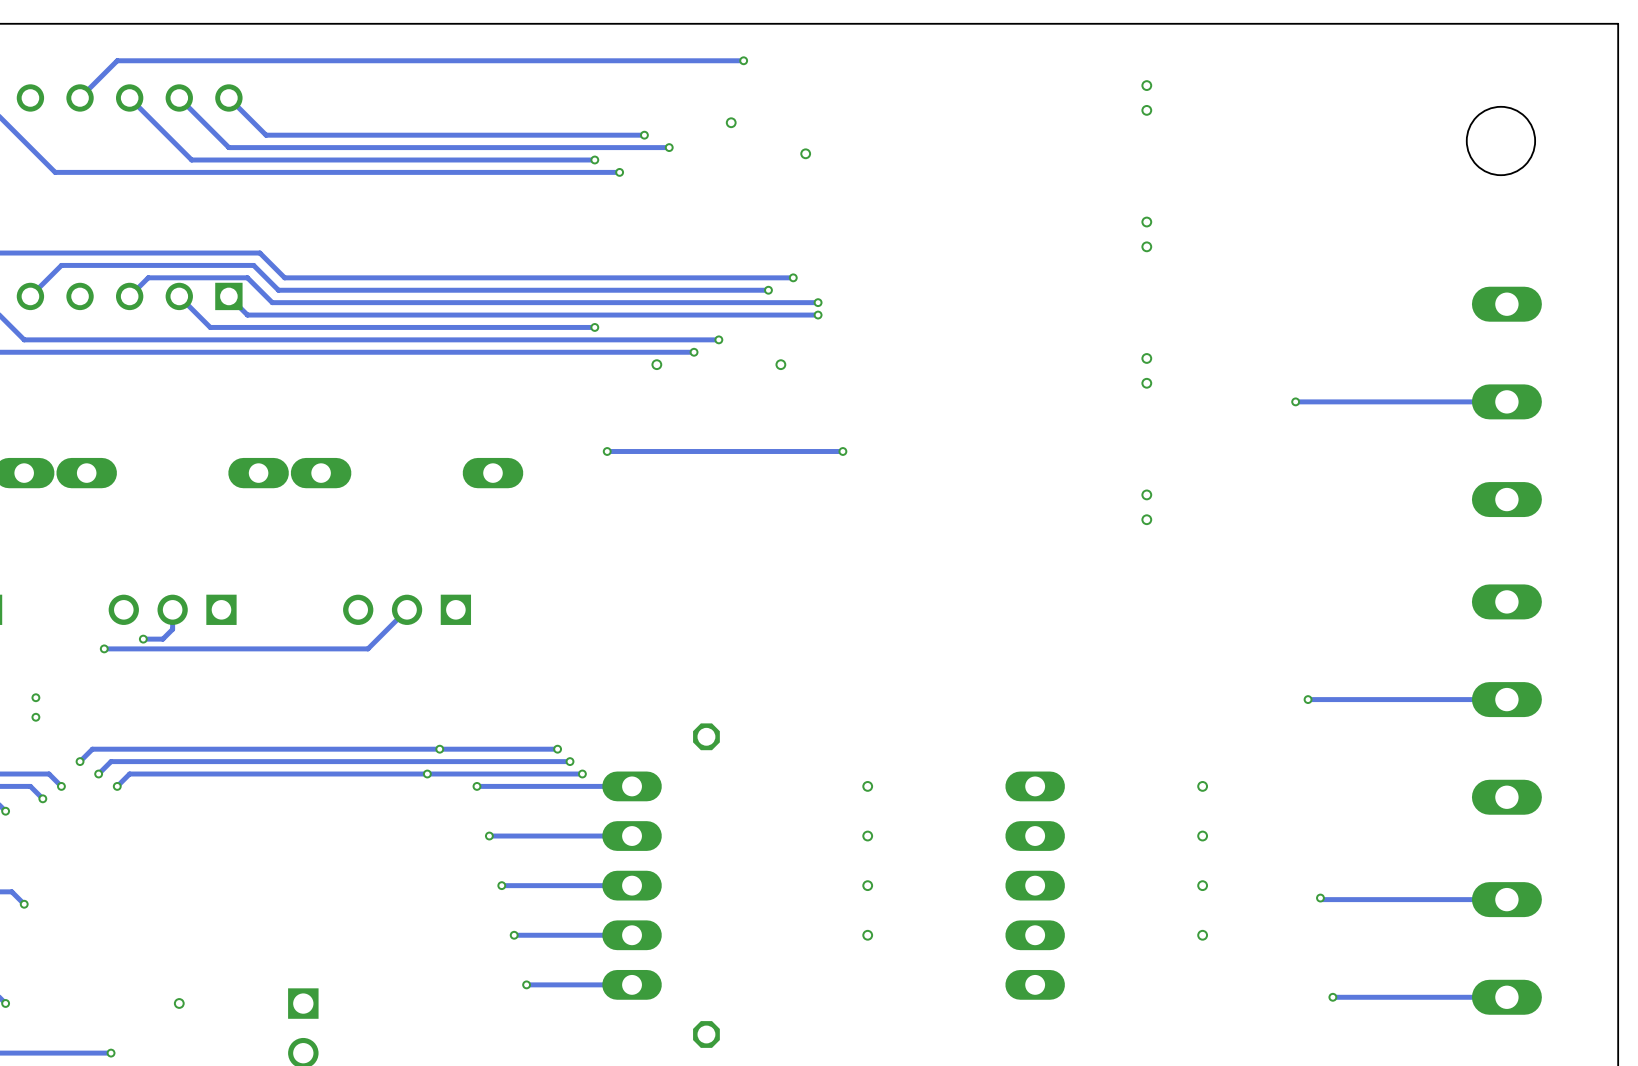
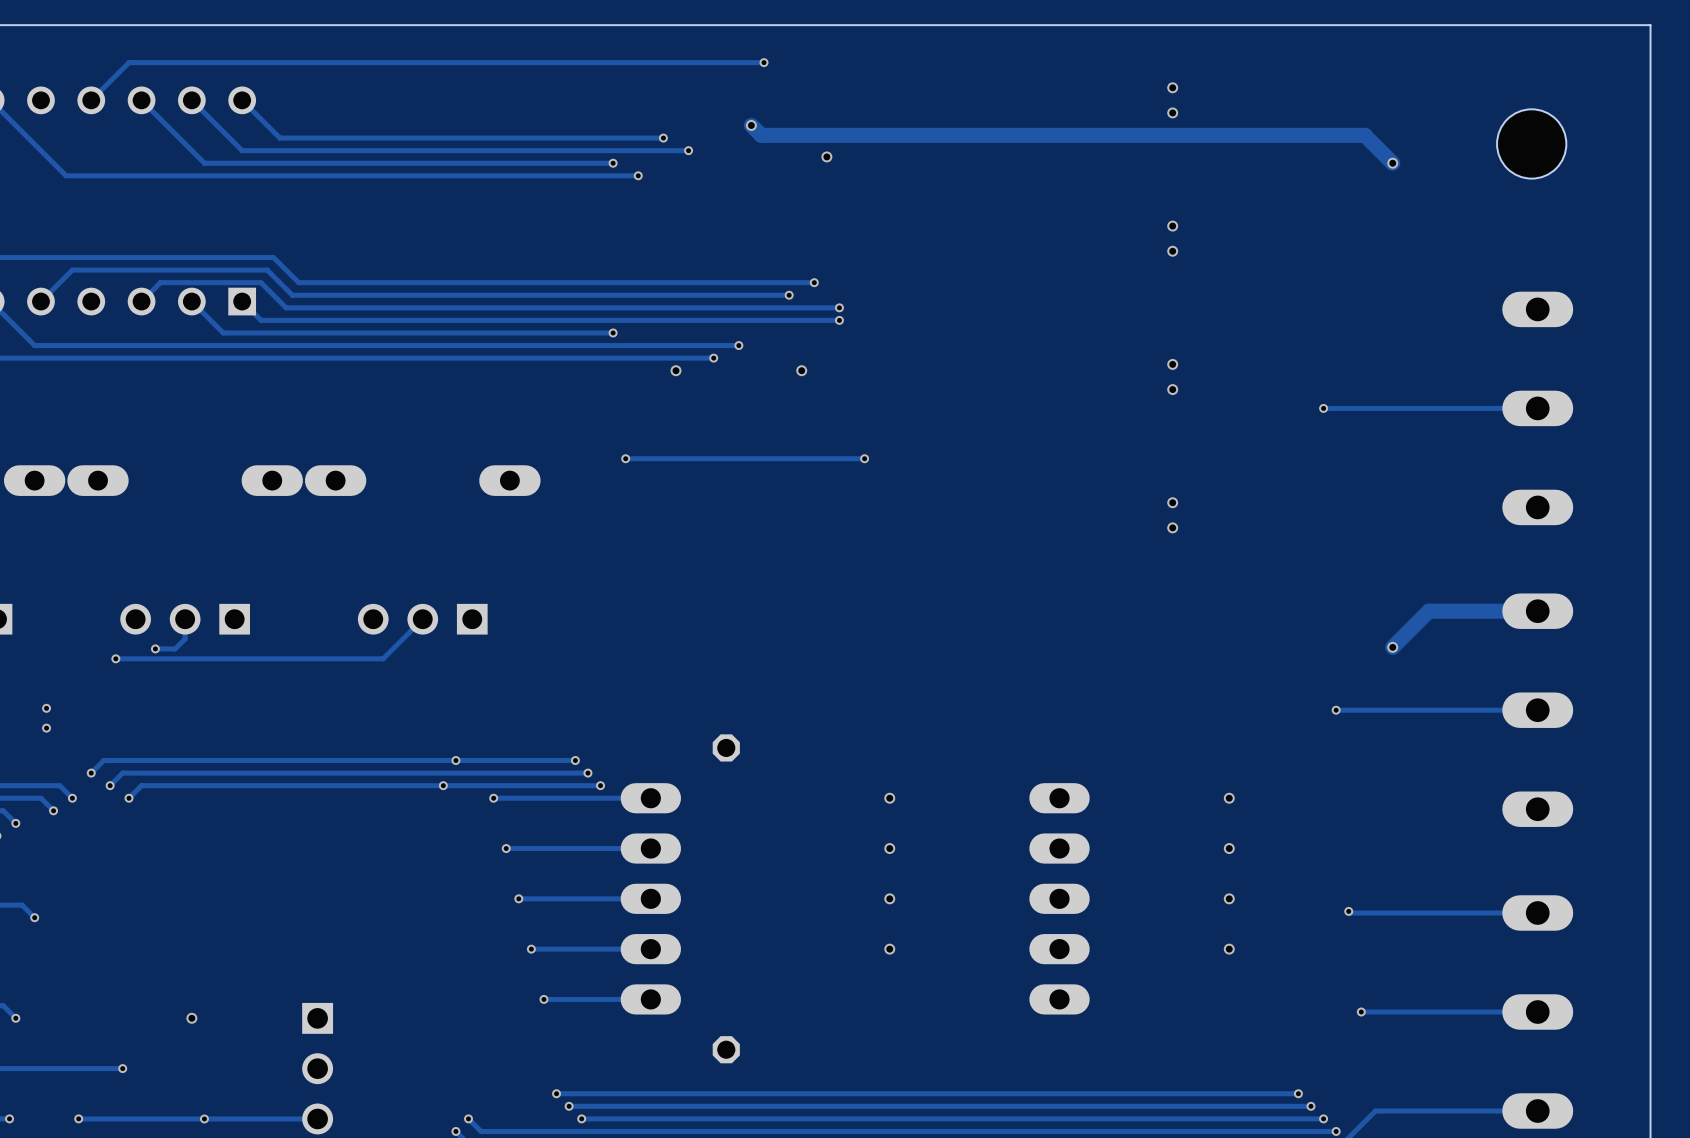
track: none -> (751, 125) (761, 135) (1364, 135) (1392, 163)
via: none -> (1392, 163)
track: none -> (1537, 611) (1428, 611) (1392, 647)
via: none -> (1392, 647)

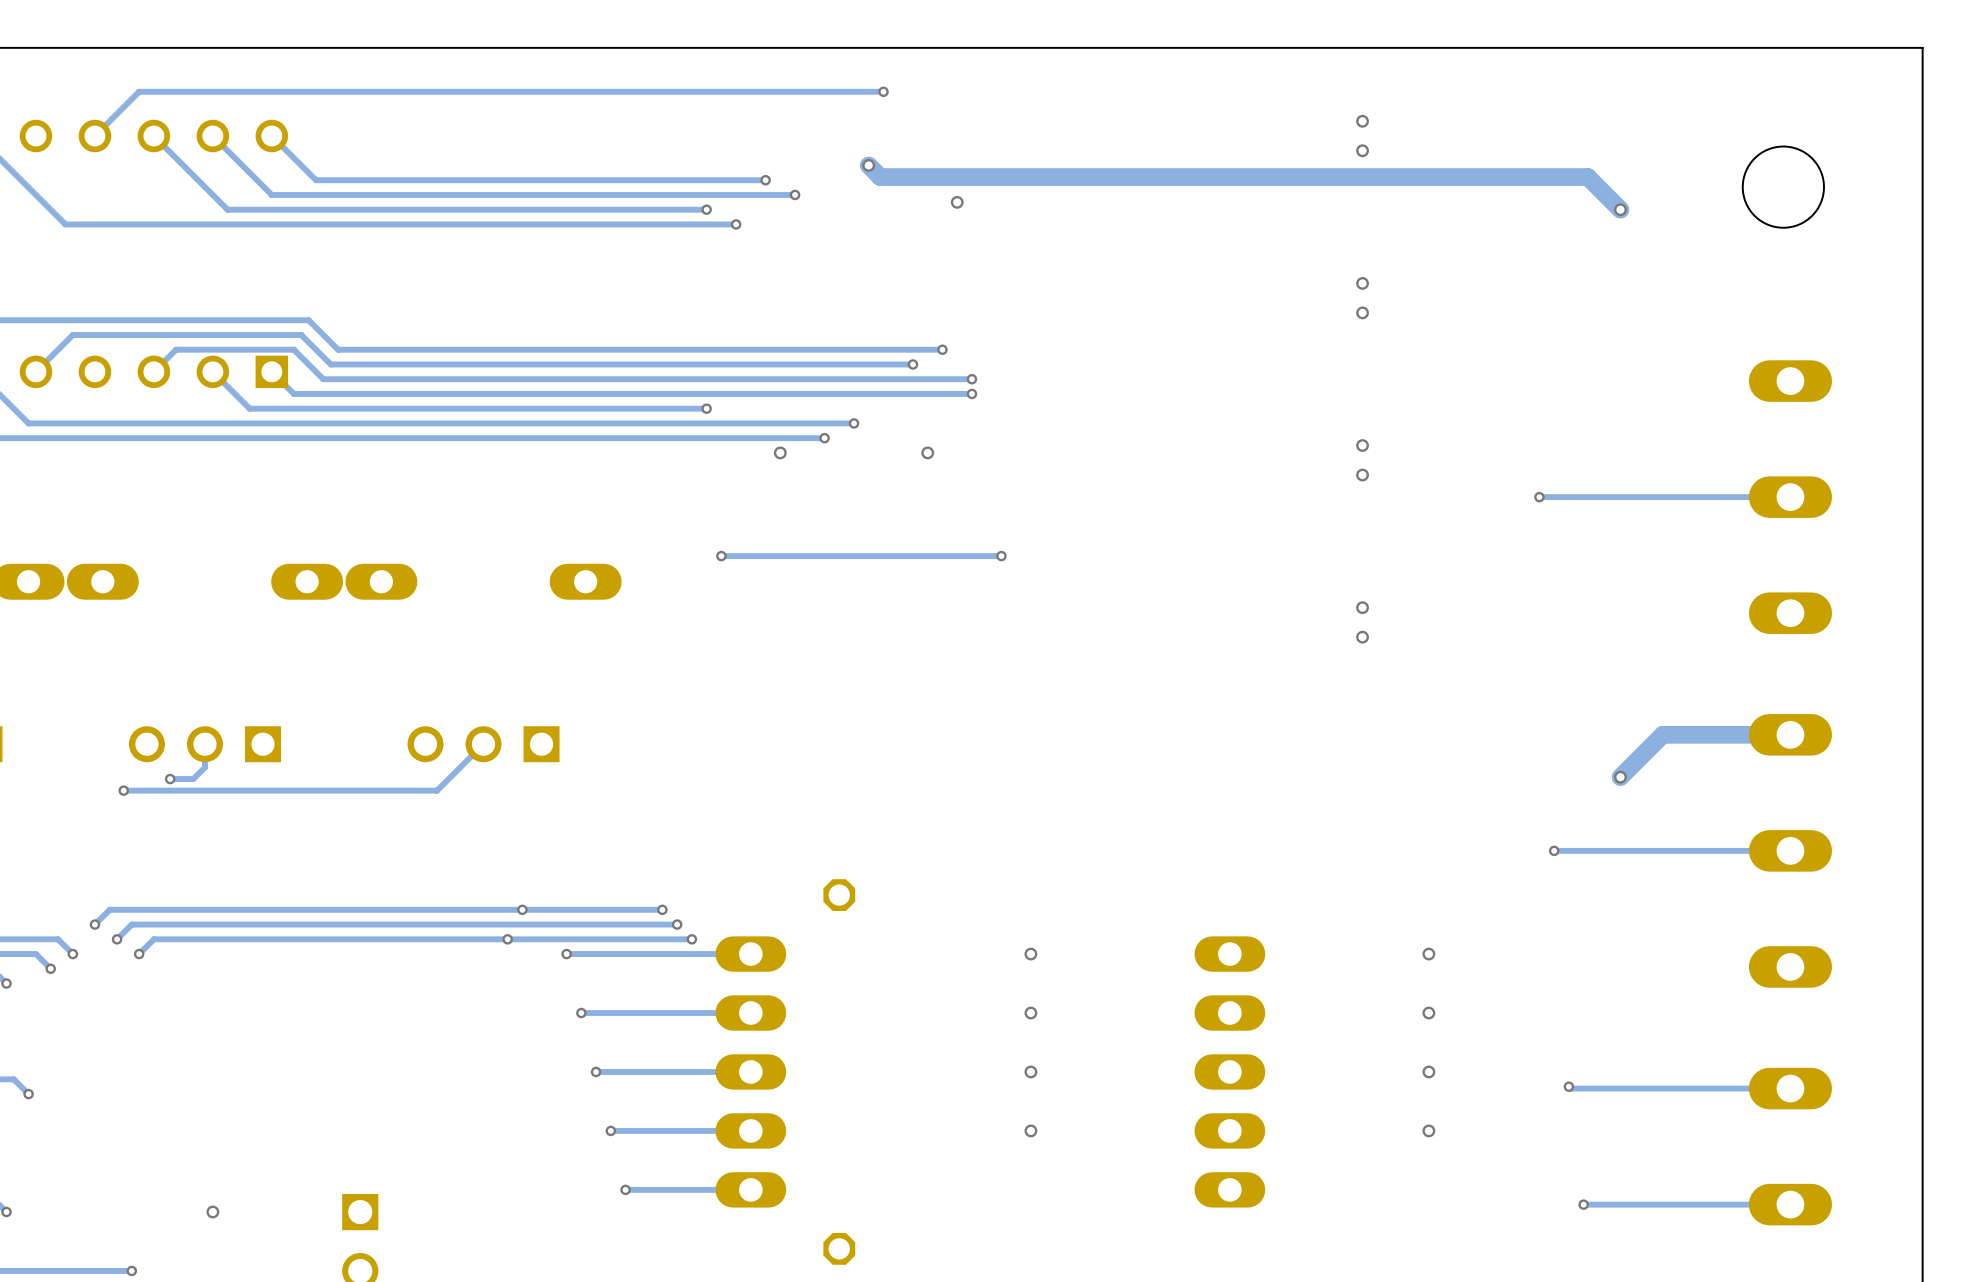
via: (46, 708) -> none
via: (46, 728) -> none

